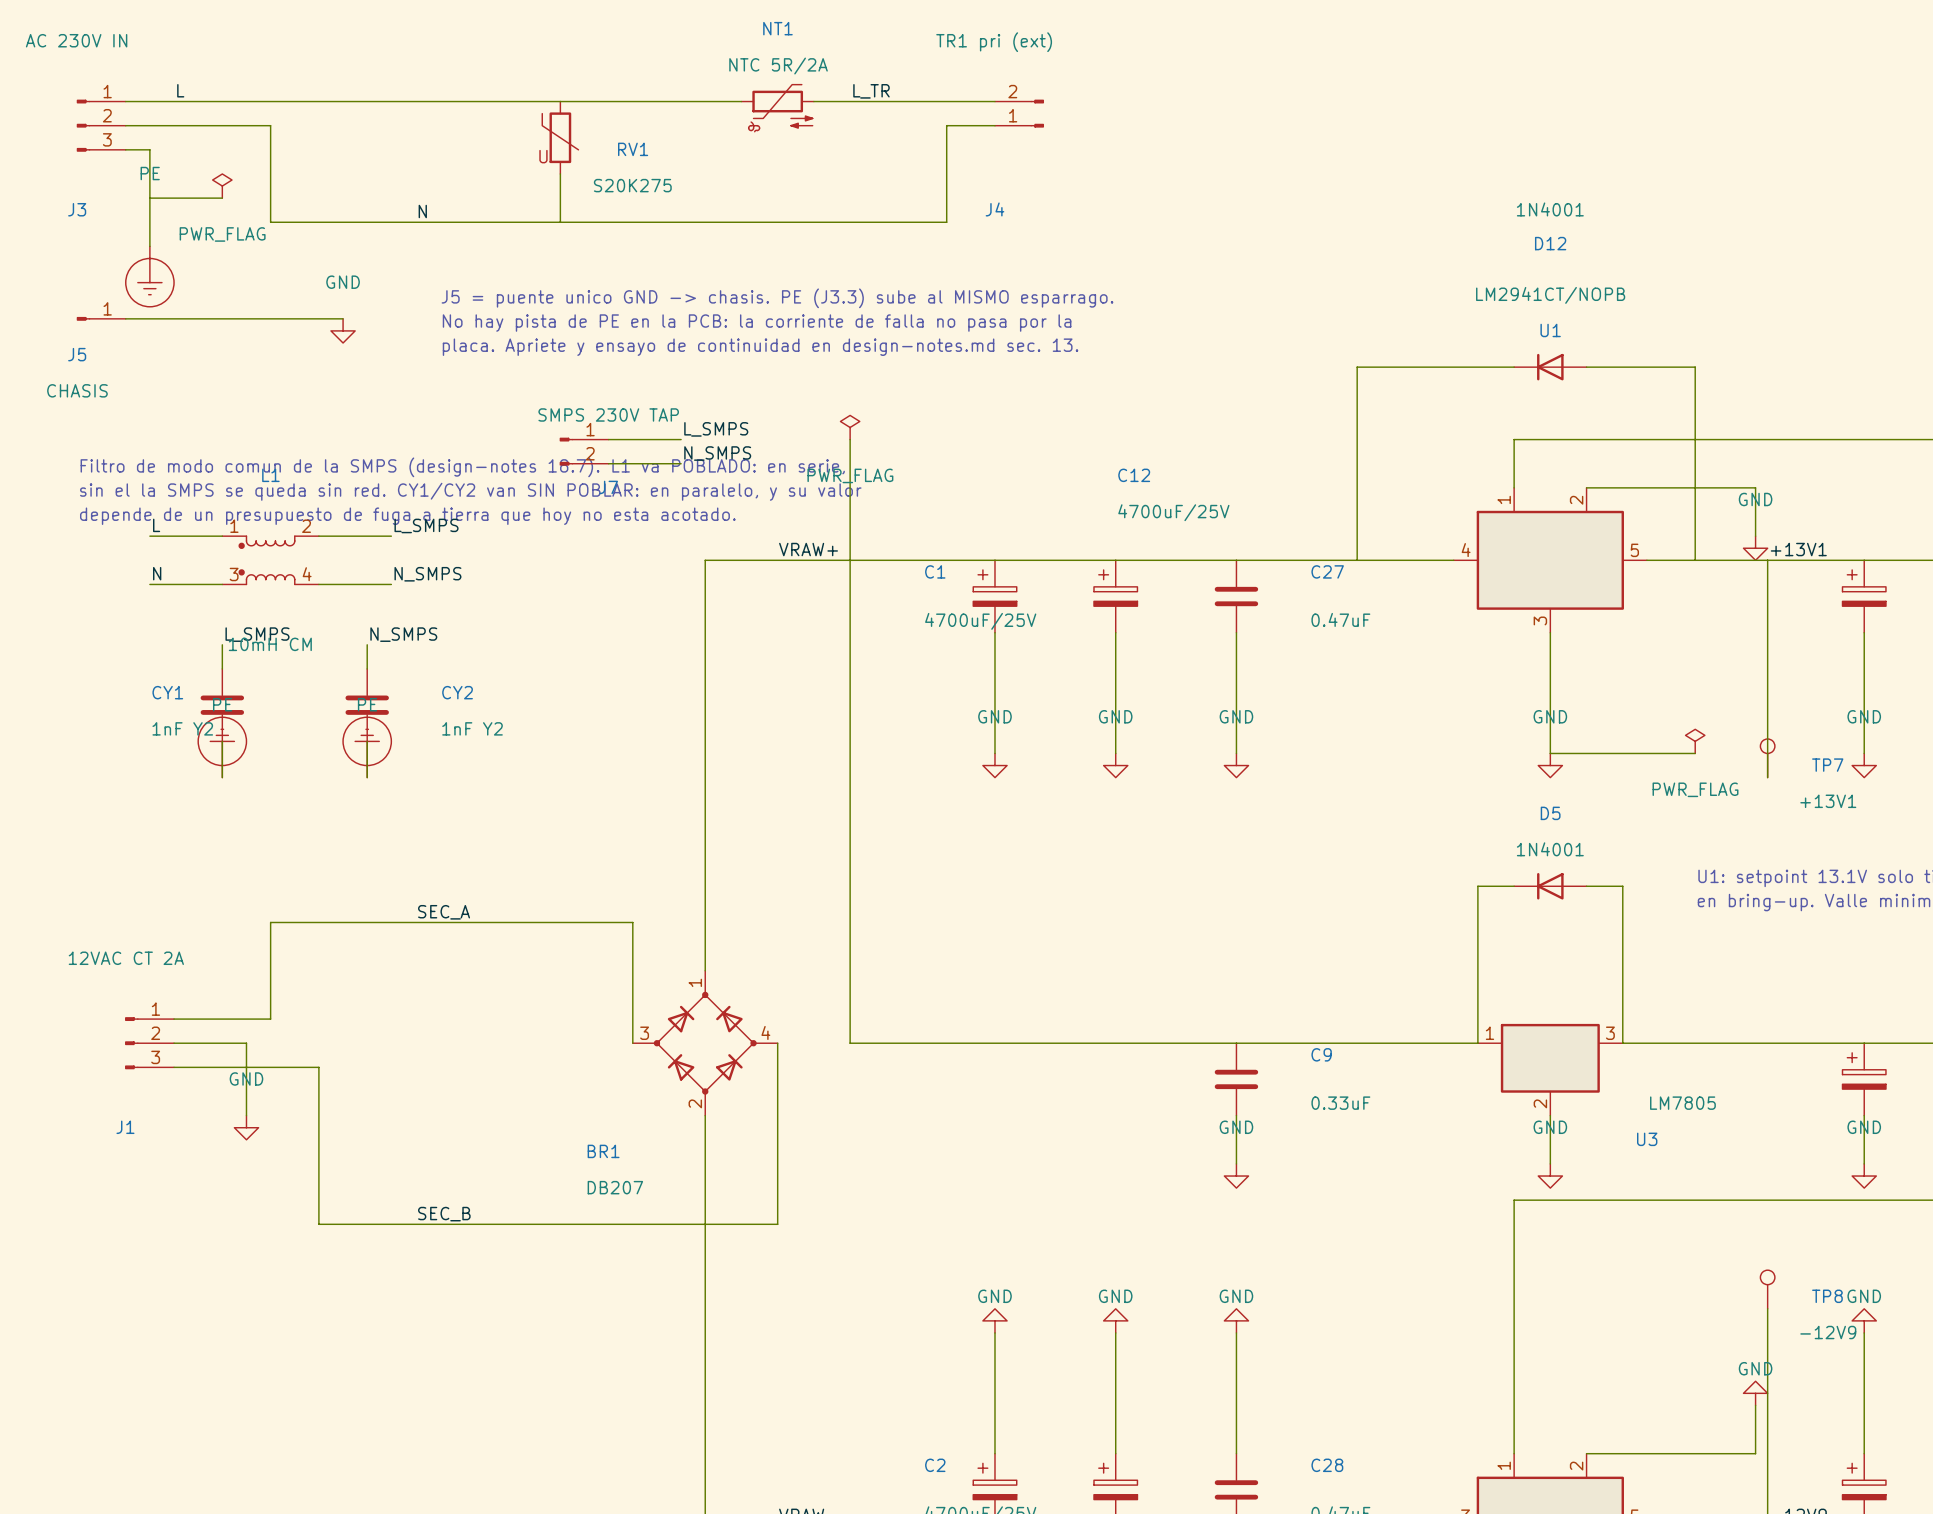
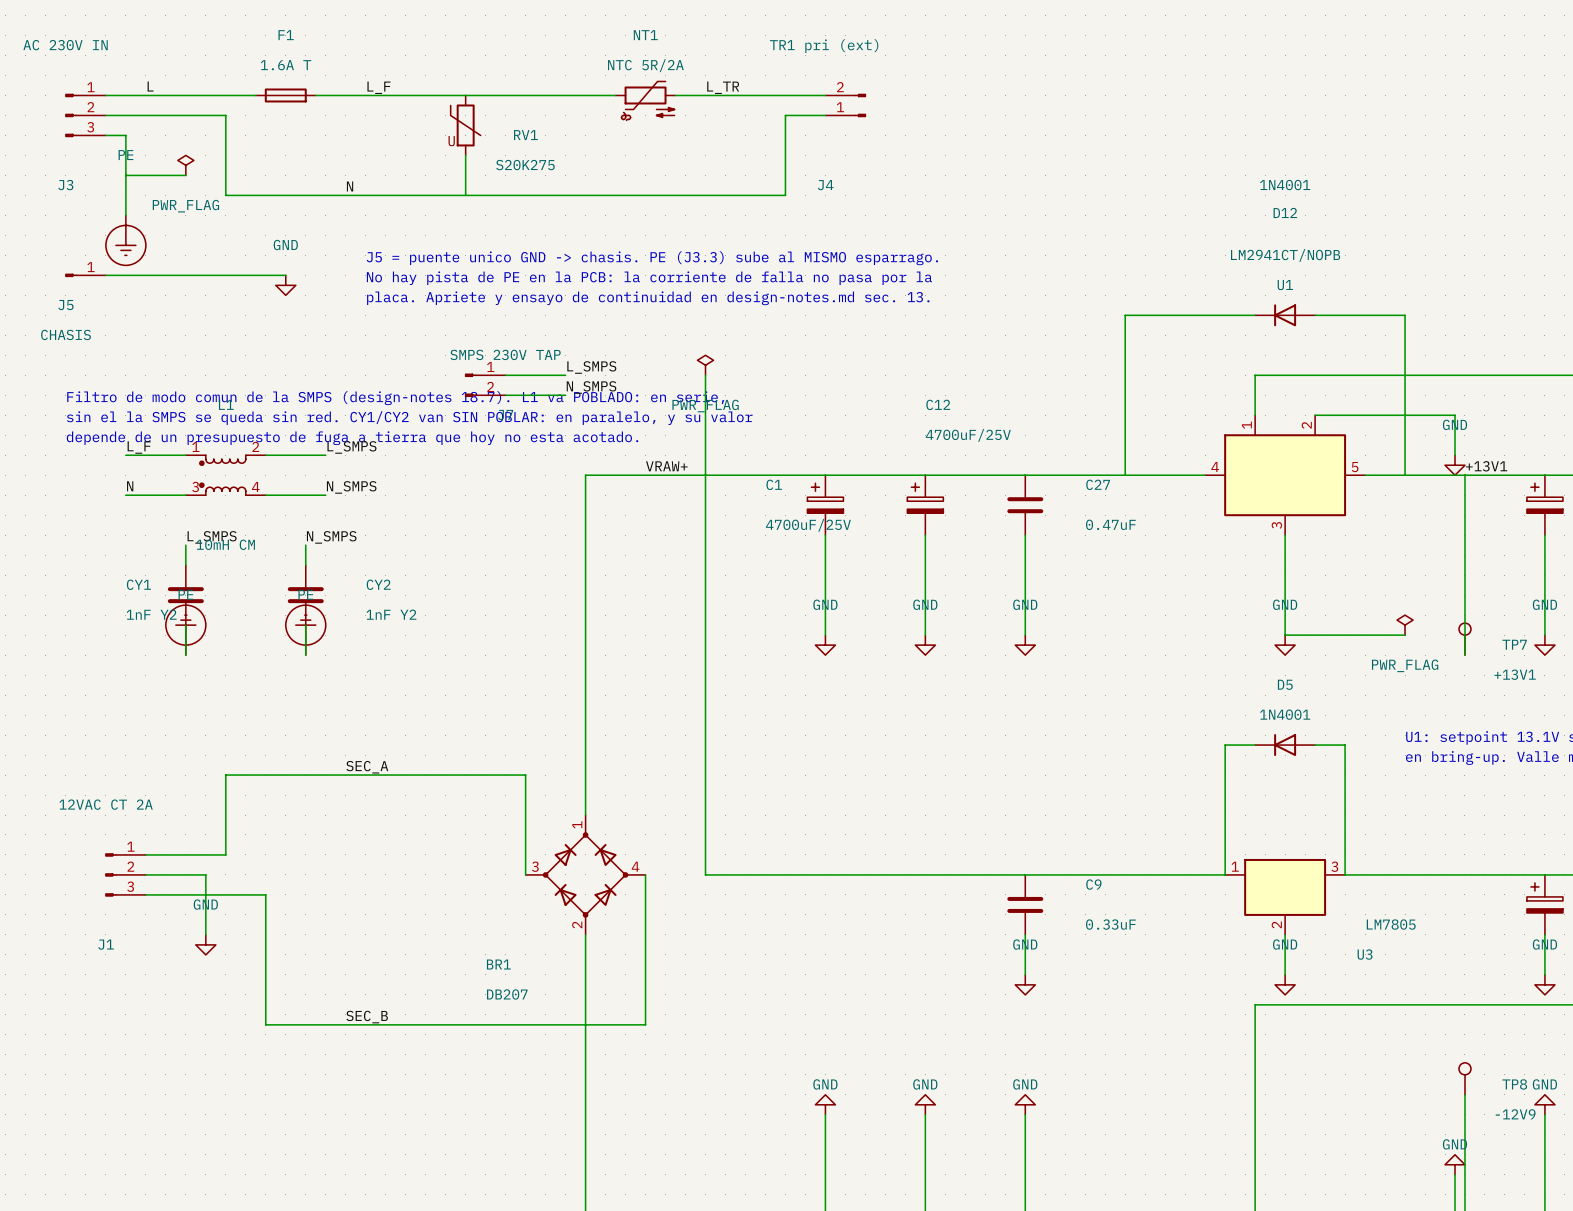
label: none -> L_F (378, 87)
F1: none -> 1.6A T (285, 95)
label: L (156, 525) -> L_F (139, 447)

